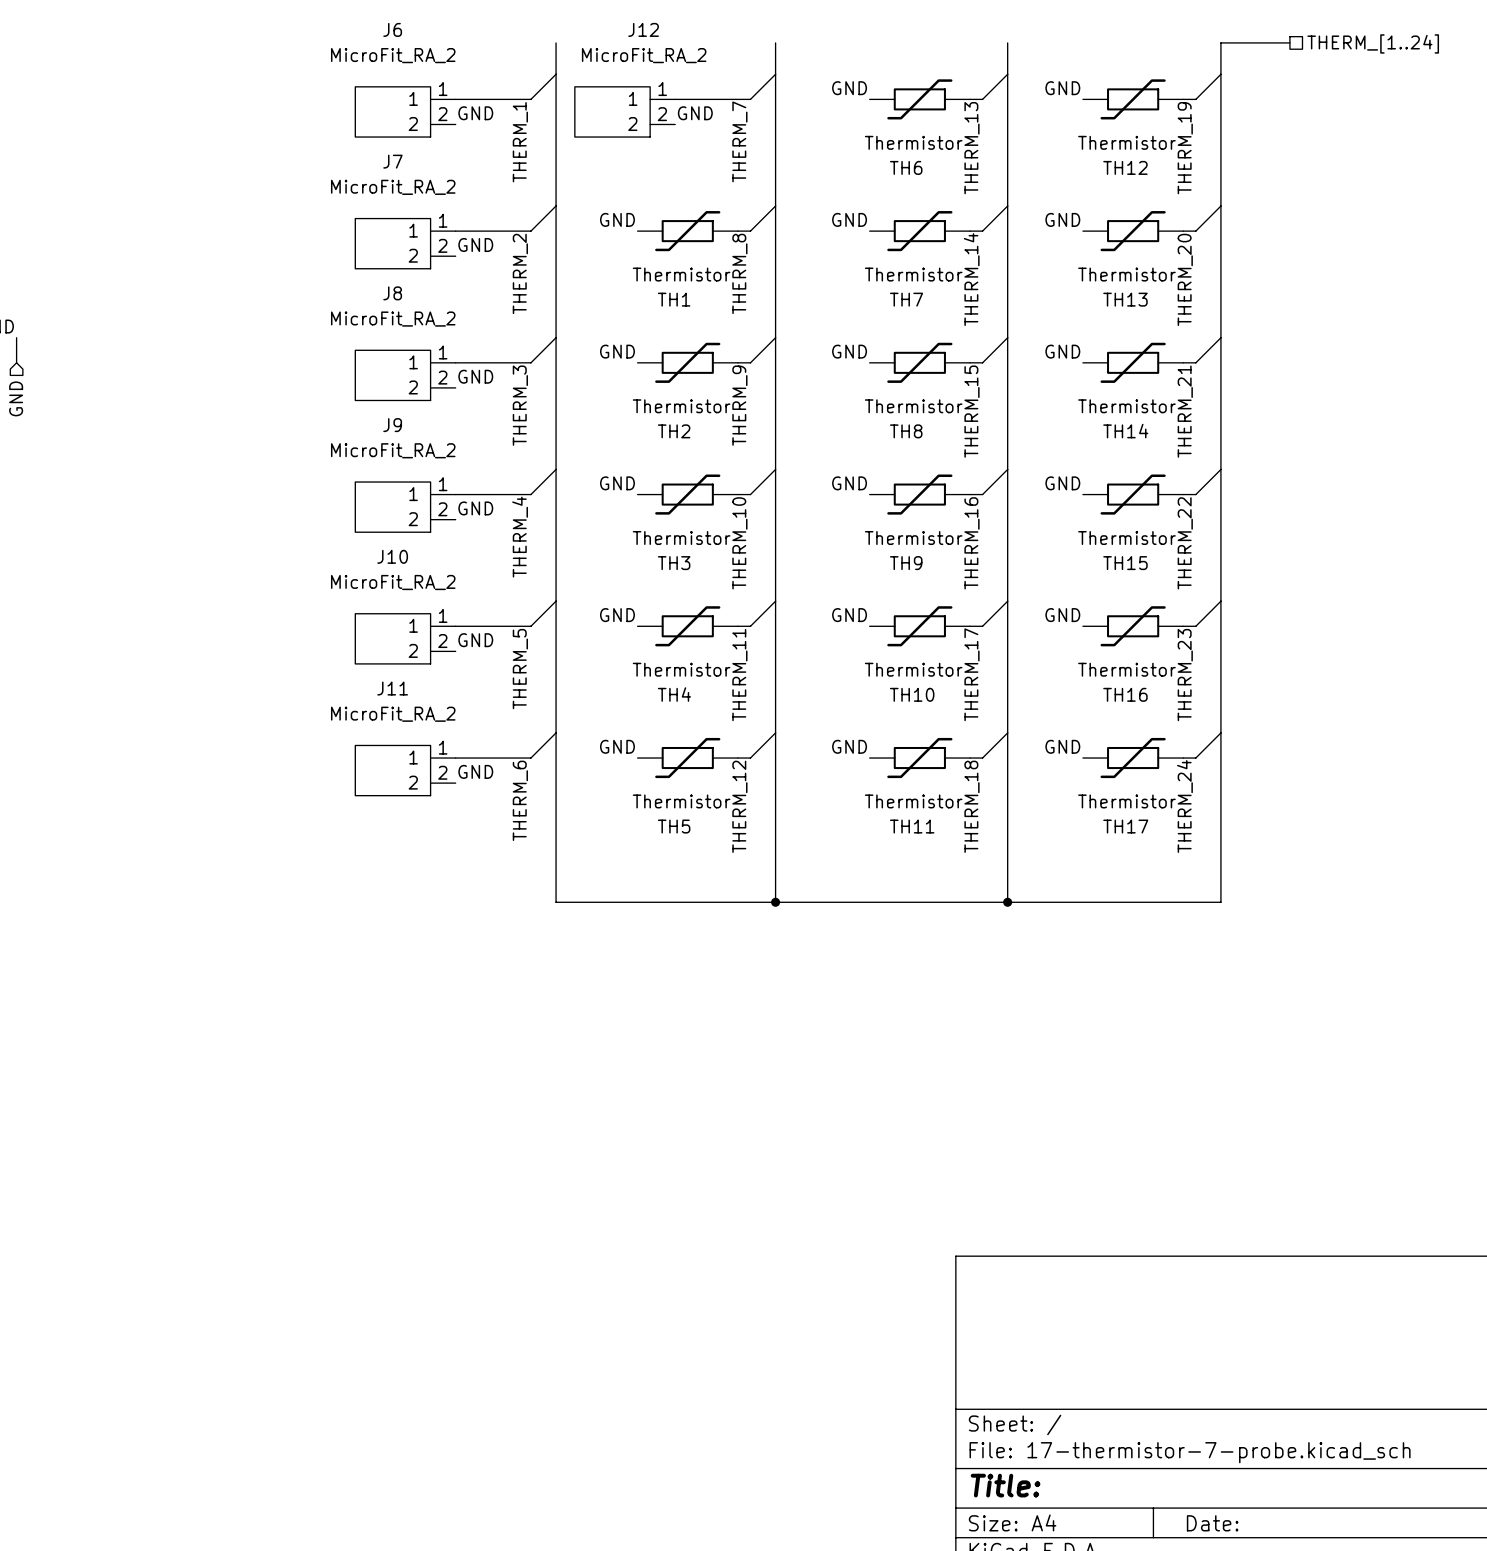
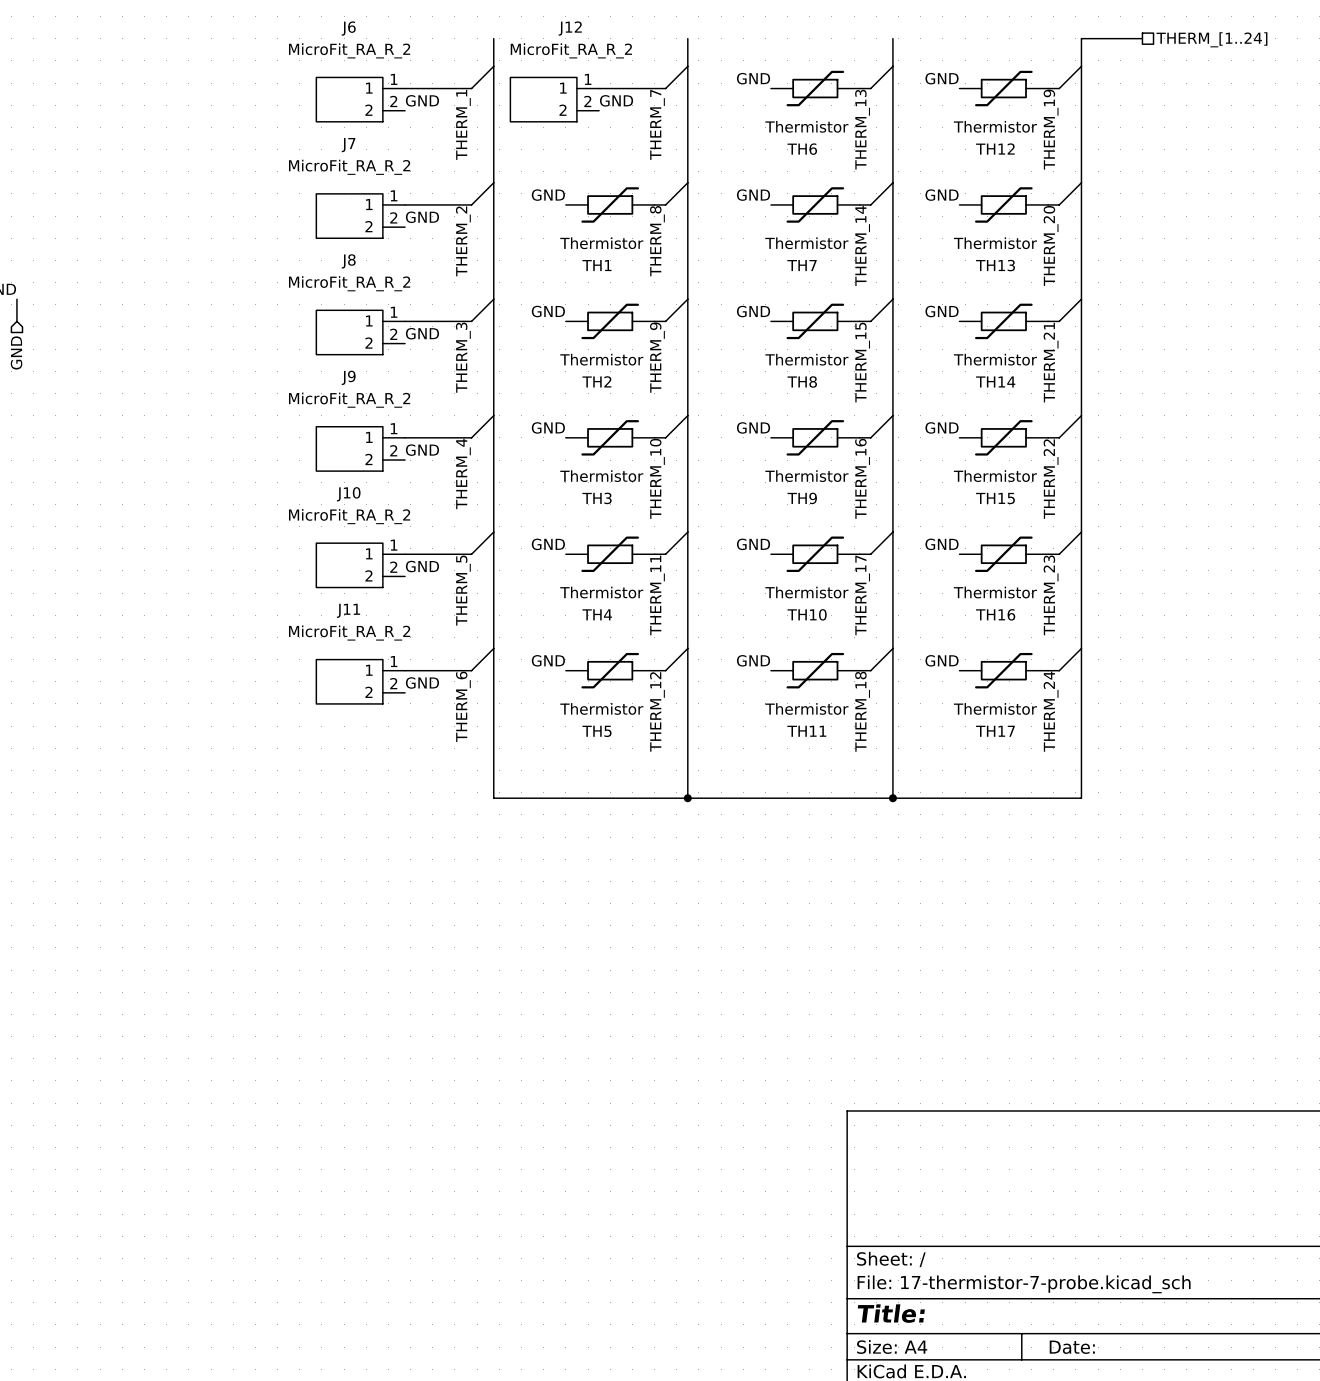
J6 value: MicroFit_RA_2 (393, 55) -> MicroFit_RA_R_2 (349, 50)
J12 value: MicroFit_RA_2 (644, 55) -> MicroFit_RA_R_2 (571, 50)
J7 value: MicroFit_RA_2 (393, 187) -> MicroFit_RA_R_2 (349, 167)
J8 value: MicroFit_RA_2 (393, 319) -> MicroFit_RA_R_2 (349, 283)
J9 value: MicroFit_RA_2 (393, 450) -> MicroFit_RA_R_2 (349, 400)
J10 value: MicroFit_RA_2 (393, 582) -> MicroFit_RA_R_2 (349, 516)
J11 value: MicroFit_RA_2 (393, 714) -> MicroFit_RA_R_2 (349, 633)

